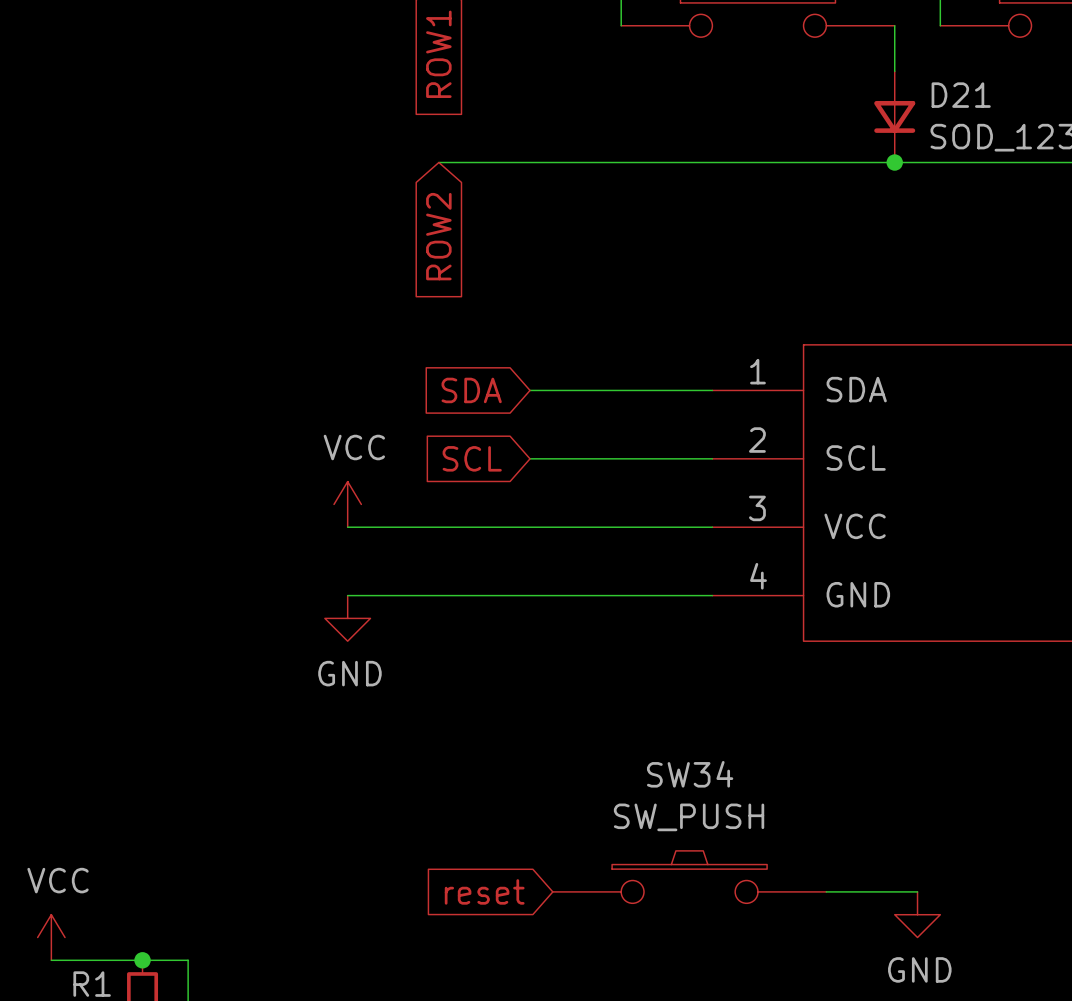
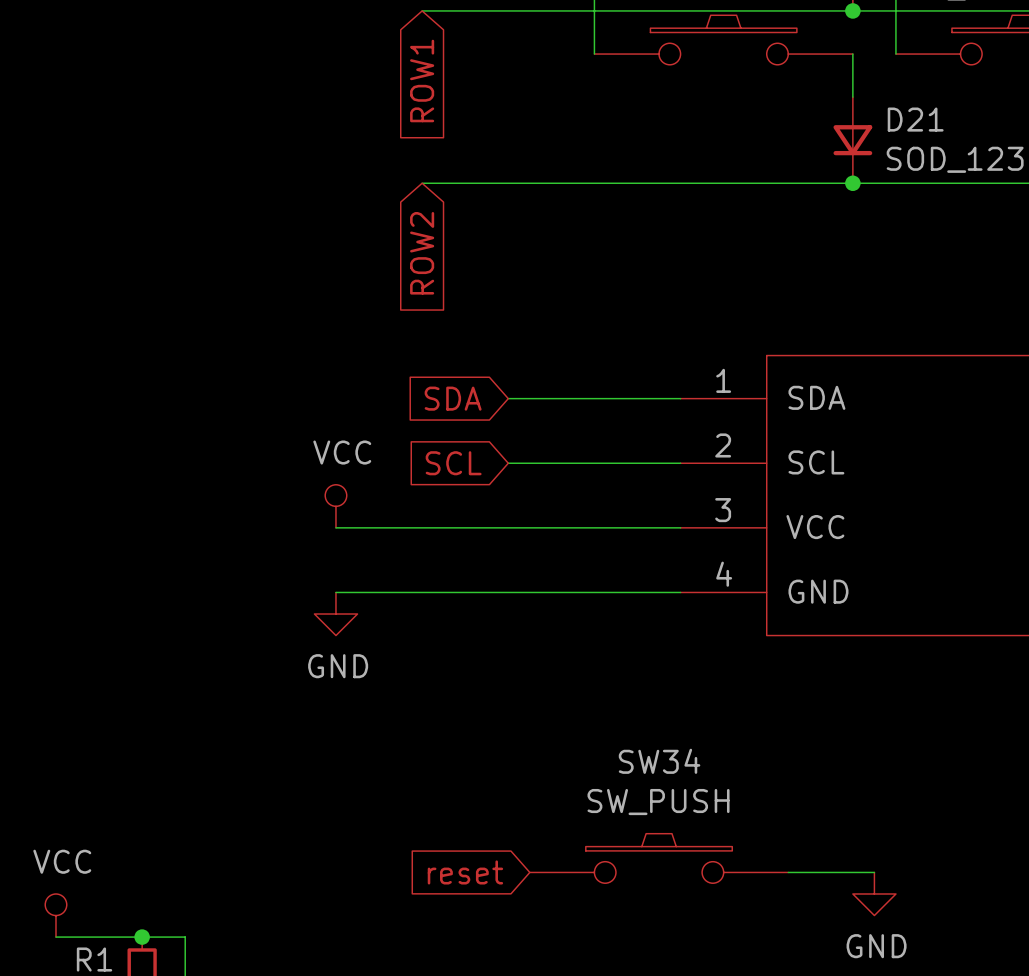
power symbol shape: [334, 481, 362, 528] -> [325, 484, 347, 528]
power symbol shape: [37, 914, 66, 961] -> [45, 893, 67, 938]

